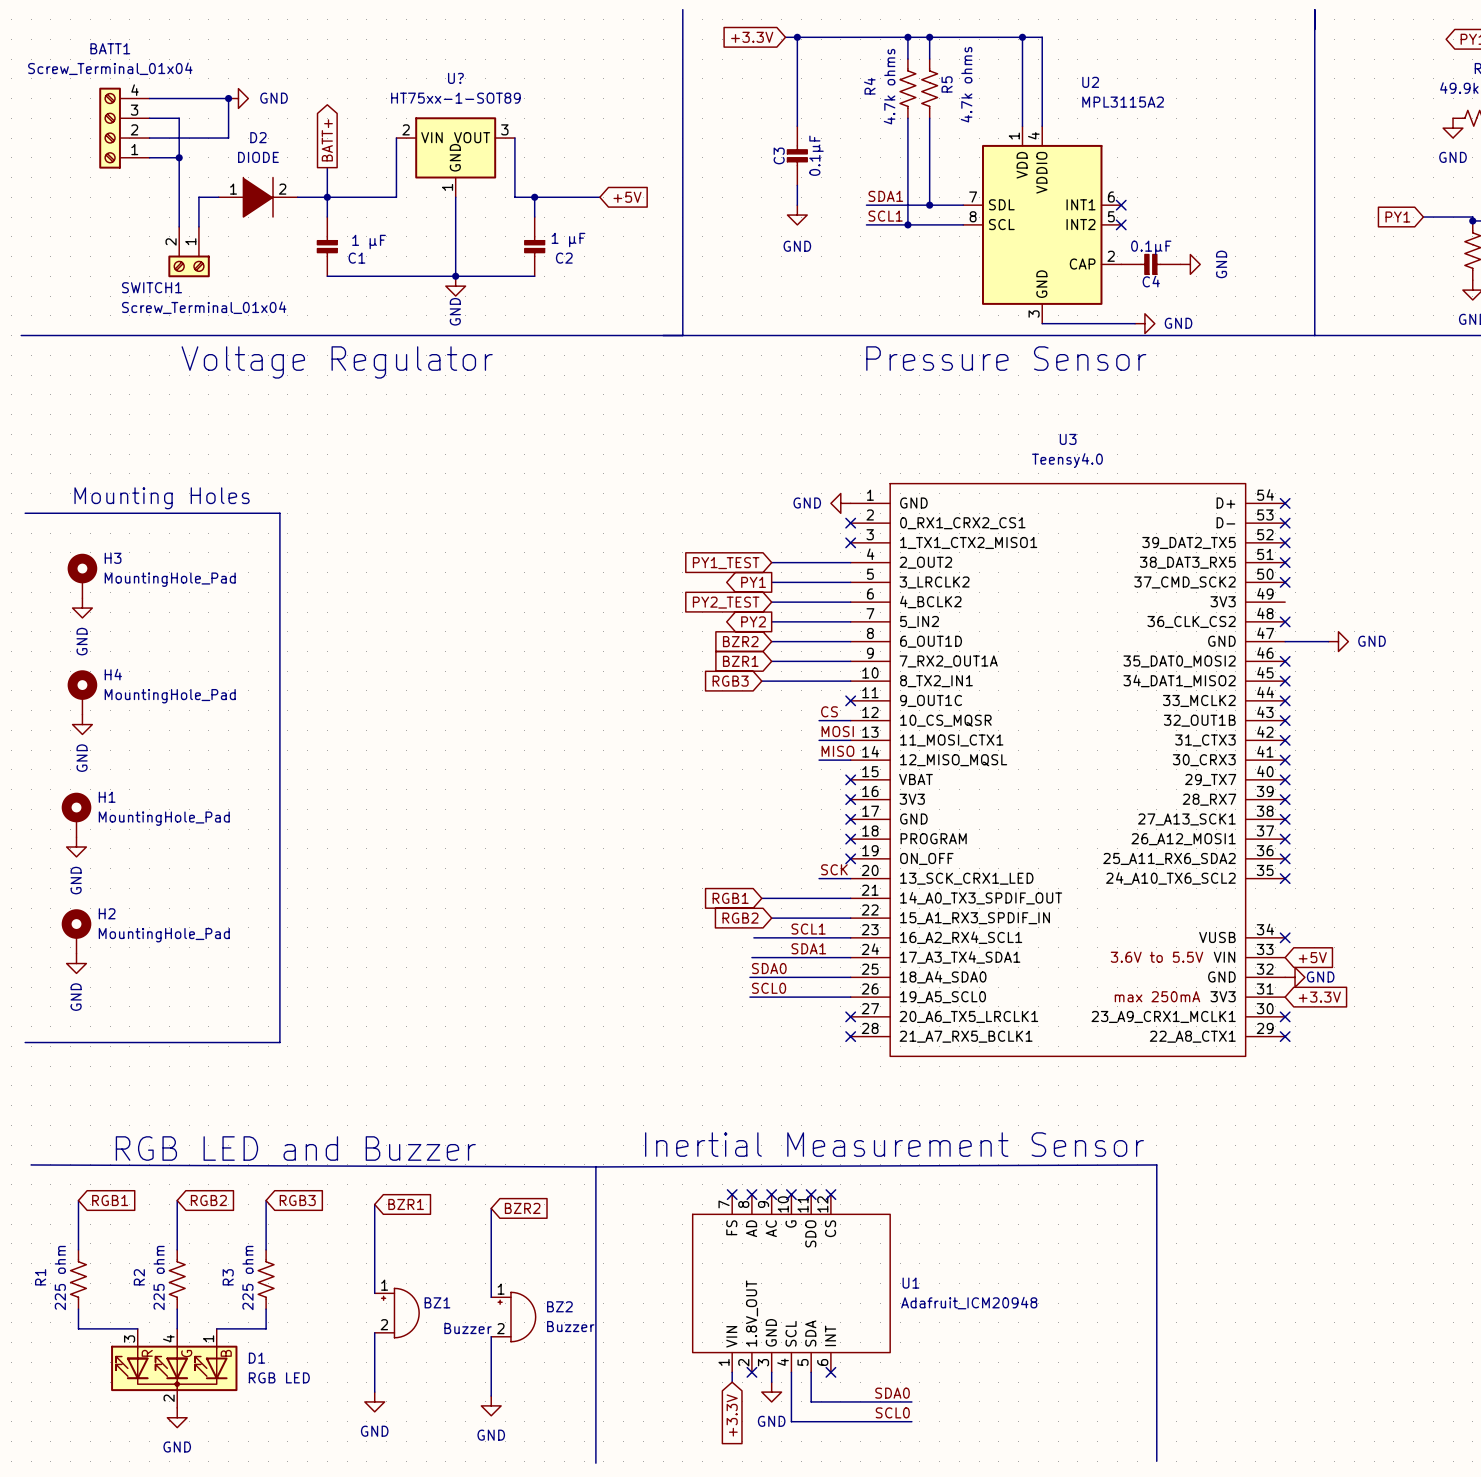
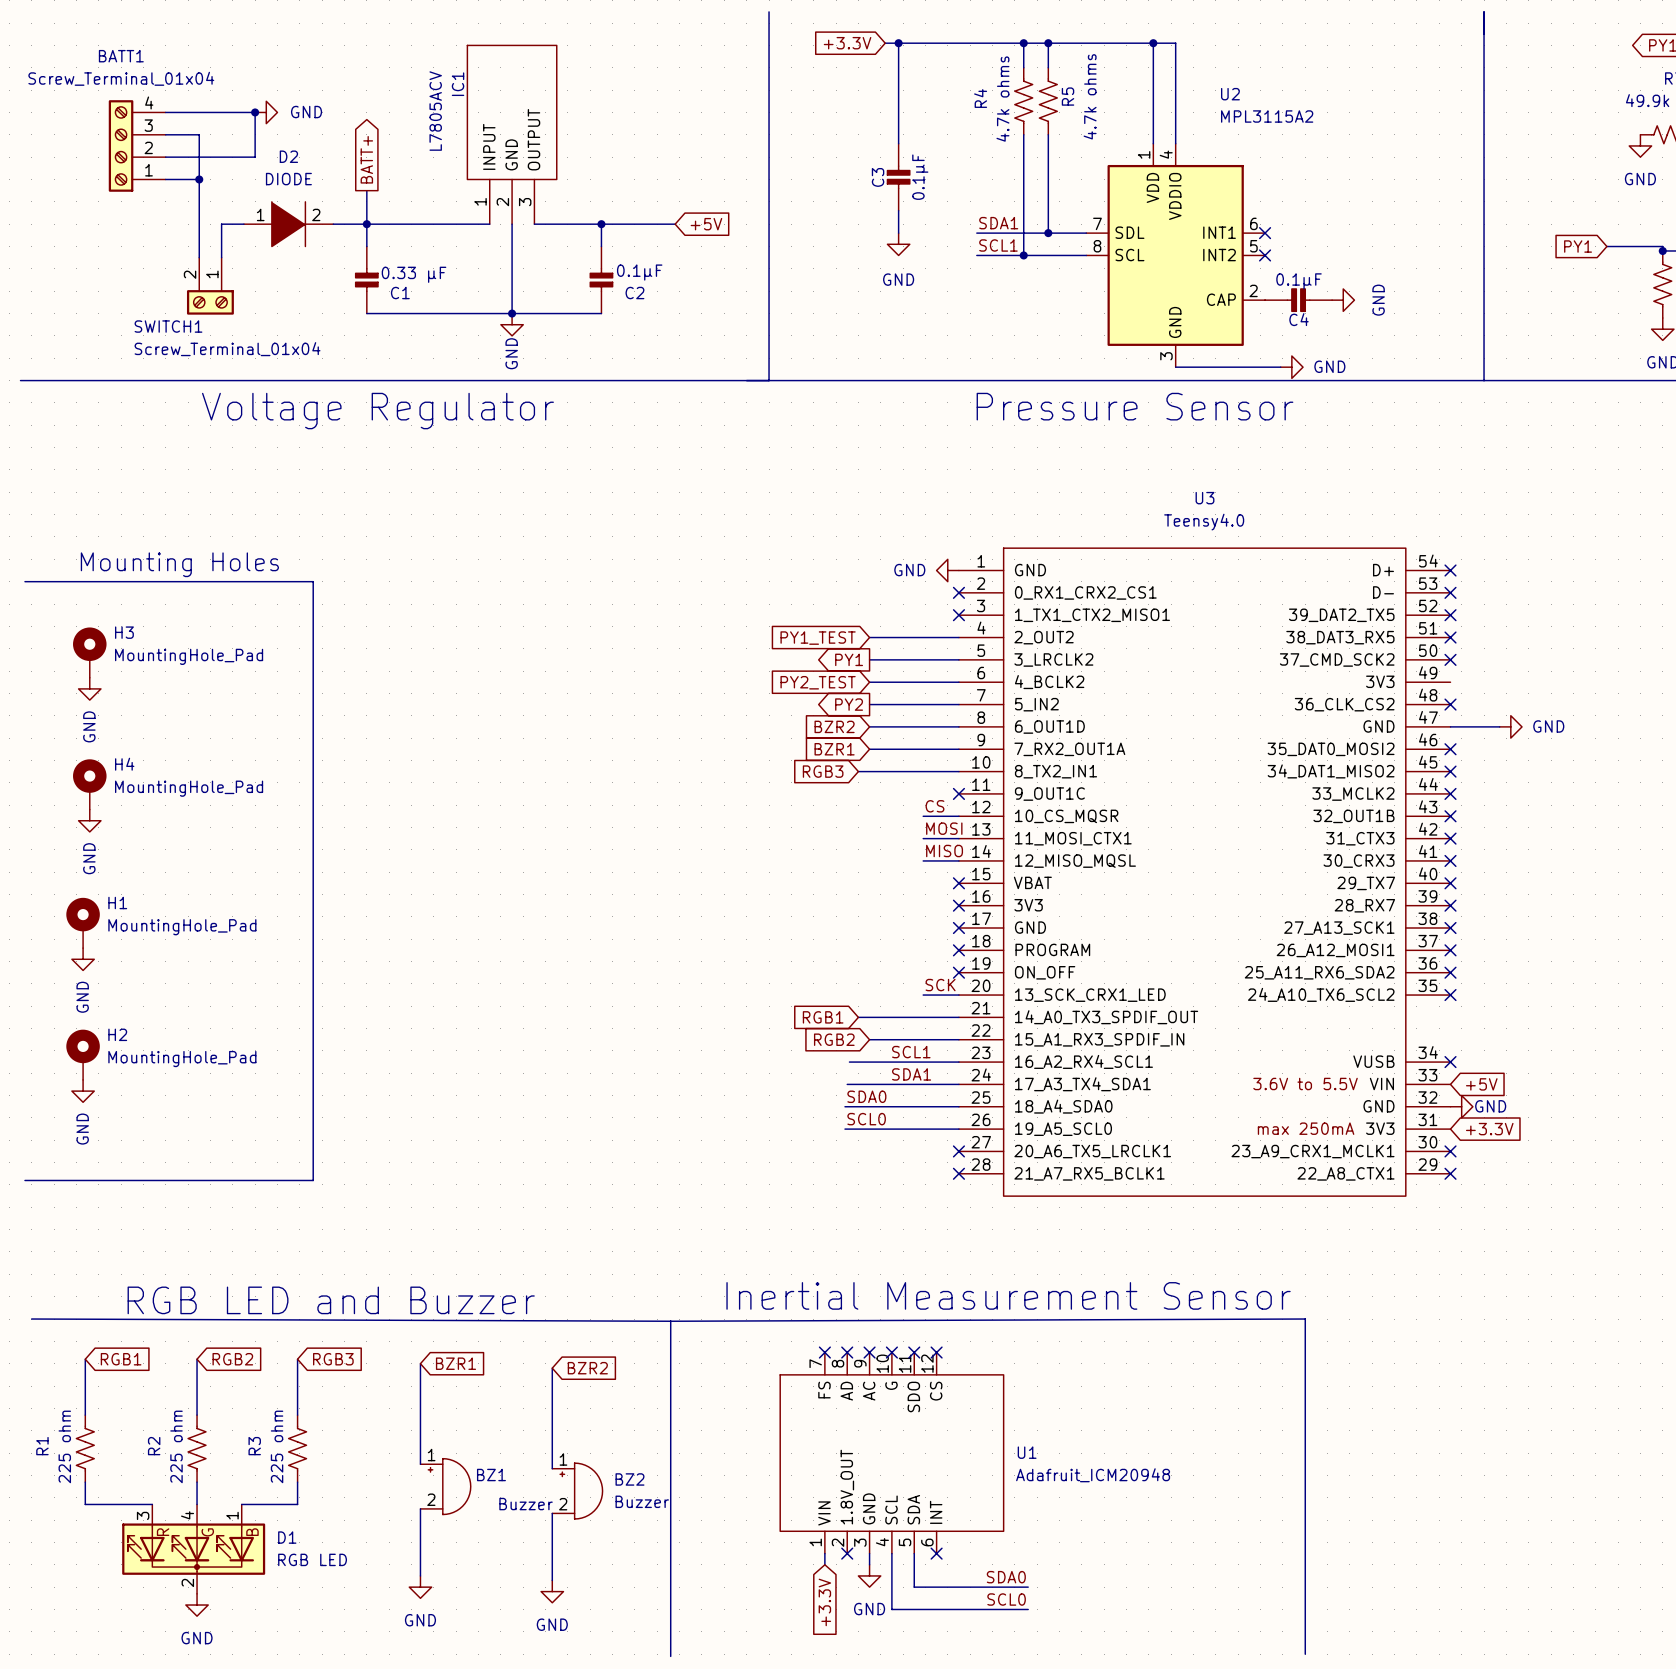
IC1: none -> L7805ACV (512, 134)
wire: (396, 138) (396, 197) -> (489, 224) (445, 224)
wire: (514, 138) (514, 197) -> (534, 224) (579, 224)
U?: HT75xx-1-SOT89 (455, 157) -> none
C2 value: 1 µF (568, 240) -> 0.1µF (639, 272)
C1 value: 1 µF (369, 241) -> 0.33 µF (414, 274)

